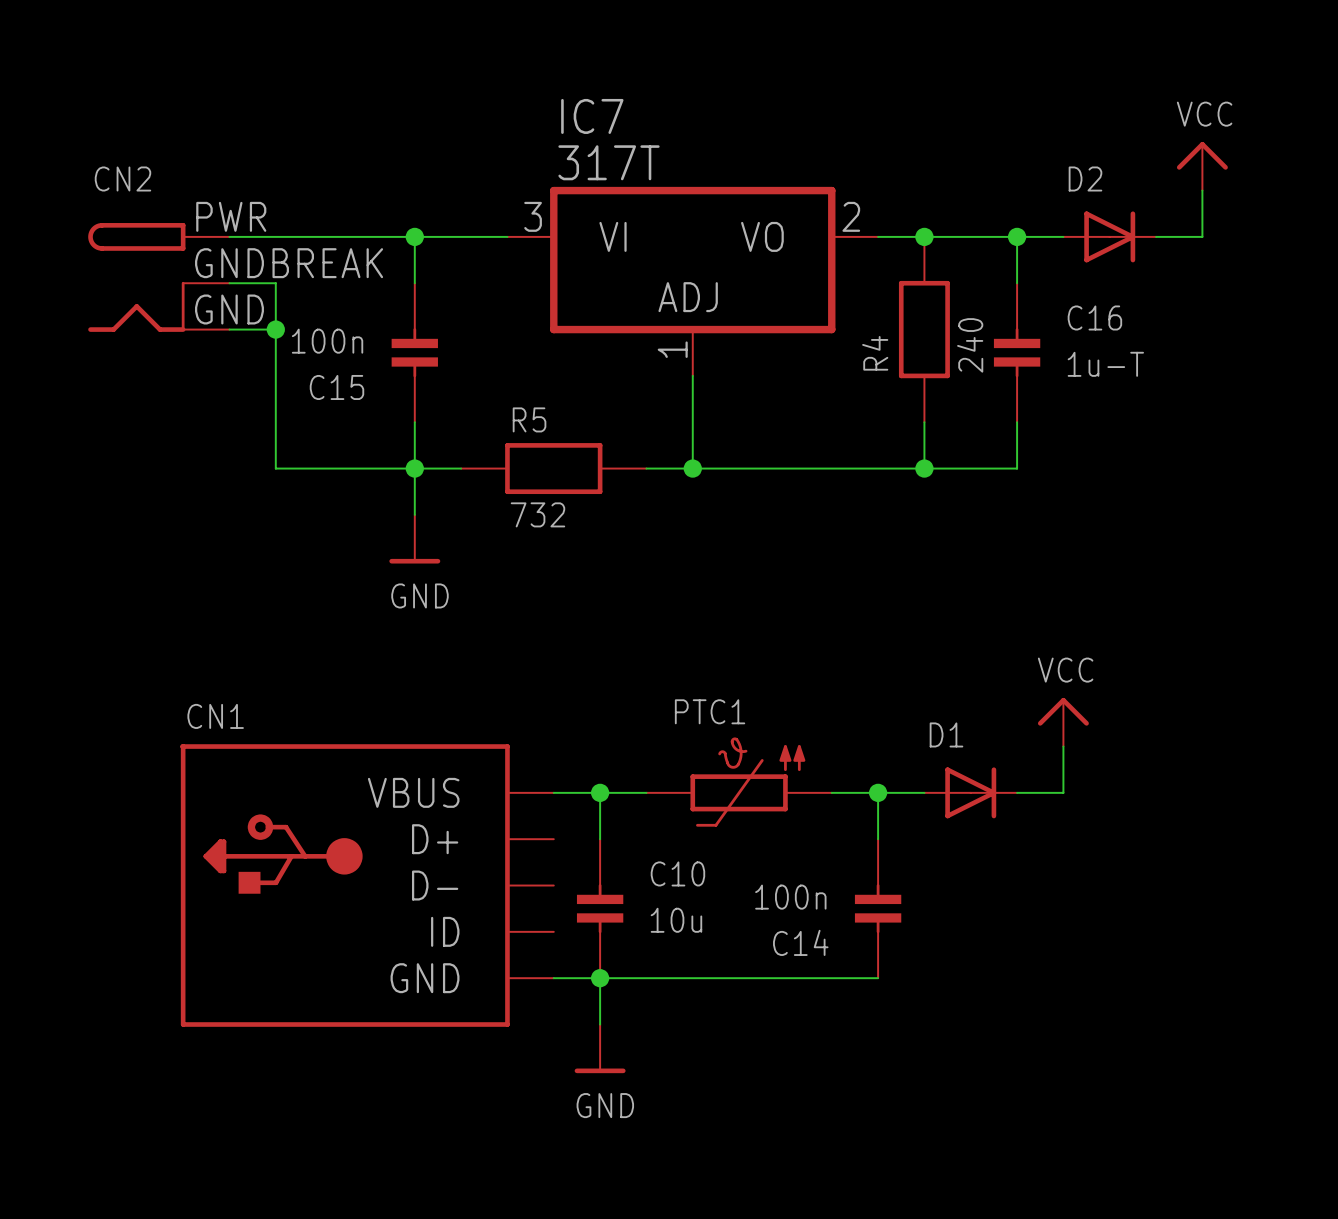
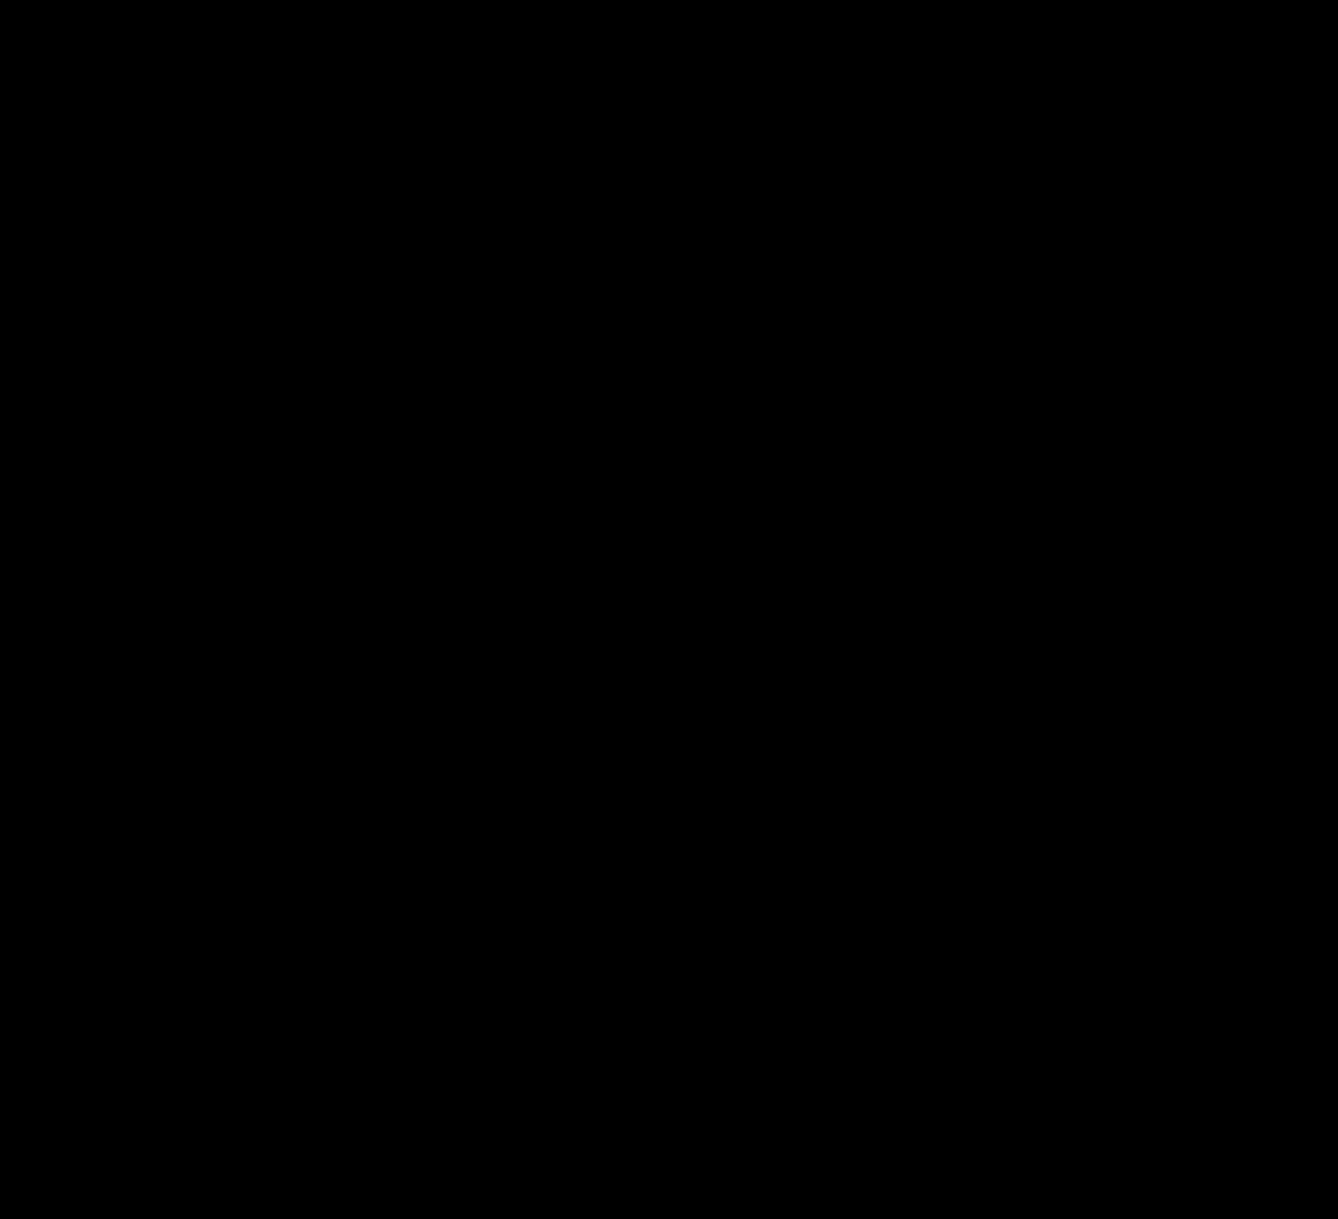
power symbol: VCC (1202, 166) -> none
wire: (1202, 190) (1202, 236) (1156, 236) -> none
wire: (229, 236) (507, 236) -> none
wire: (414, 236) (414, 283) -> none
junction: (414, 236) -> none
wire: (878, 236) (1063, 236) -> none
junction: (924, 236) -> none
wire: (1017, 236) (1017, 283) -> none
junction: (1017, 236) -> none
D2: (1109, 236) -> none
CN2: (158, 277) -> none
IC7: 317T (692, 281) -> none
wire: (229, 283) (275, 283) (275, 468) (461, 468) -> none
wire: (229, 329) (275, 329) -> none
junction: (275, 329) -> none
R4: 240 (924, 329) -> none
C15: 100n (414, 352) -> none
C16: 1u-T (1017, 352) -> none
wire: (692, 375) (692, 468) -> none
wire: (414, 422) (414, 514) -> none
wire: (924, 422) (924, 468) -> none
wire: (1017, 422) (1017, 468) (646, 468) -> none
junction: (414, 468) -> none
R5: 732 (553, 468) -> none
junction: (692, 468) -> none
junction: (924, 468) -> none
power symbol: GND (414, 539) -> none
power symbol: VCC (1063, 722) -> none
wire: (1063, 746) (1063, 792) (1017, 792) -> none
PTC1: (739, 782) -> none
wire: (553, 792) (646, 792) -> none
wire: (600, 792) (600, 839) -> none
junction: (600, 792) -> none
wire: (831, 792) (924, 792) -> none
wire: (878, 792) (878, 839) -> none
junction: (878, 792) -> none
D1: (970, 792) -> none
CN1: (366, 885) -> none
C10: 10u (600, 908) -> none
C14: 100n (878, 908) -> none
wire: (553, 978) (878, 978) -> none
wire: (600, 978) (600, 1024) -> none
junction: (600, 978) -> none
power symbol: GND (600, 1048) -> none

